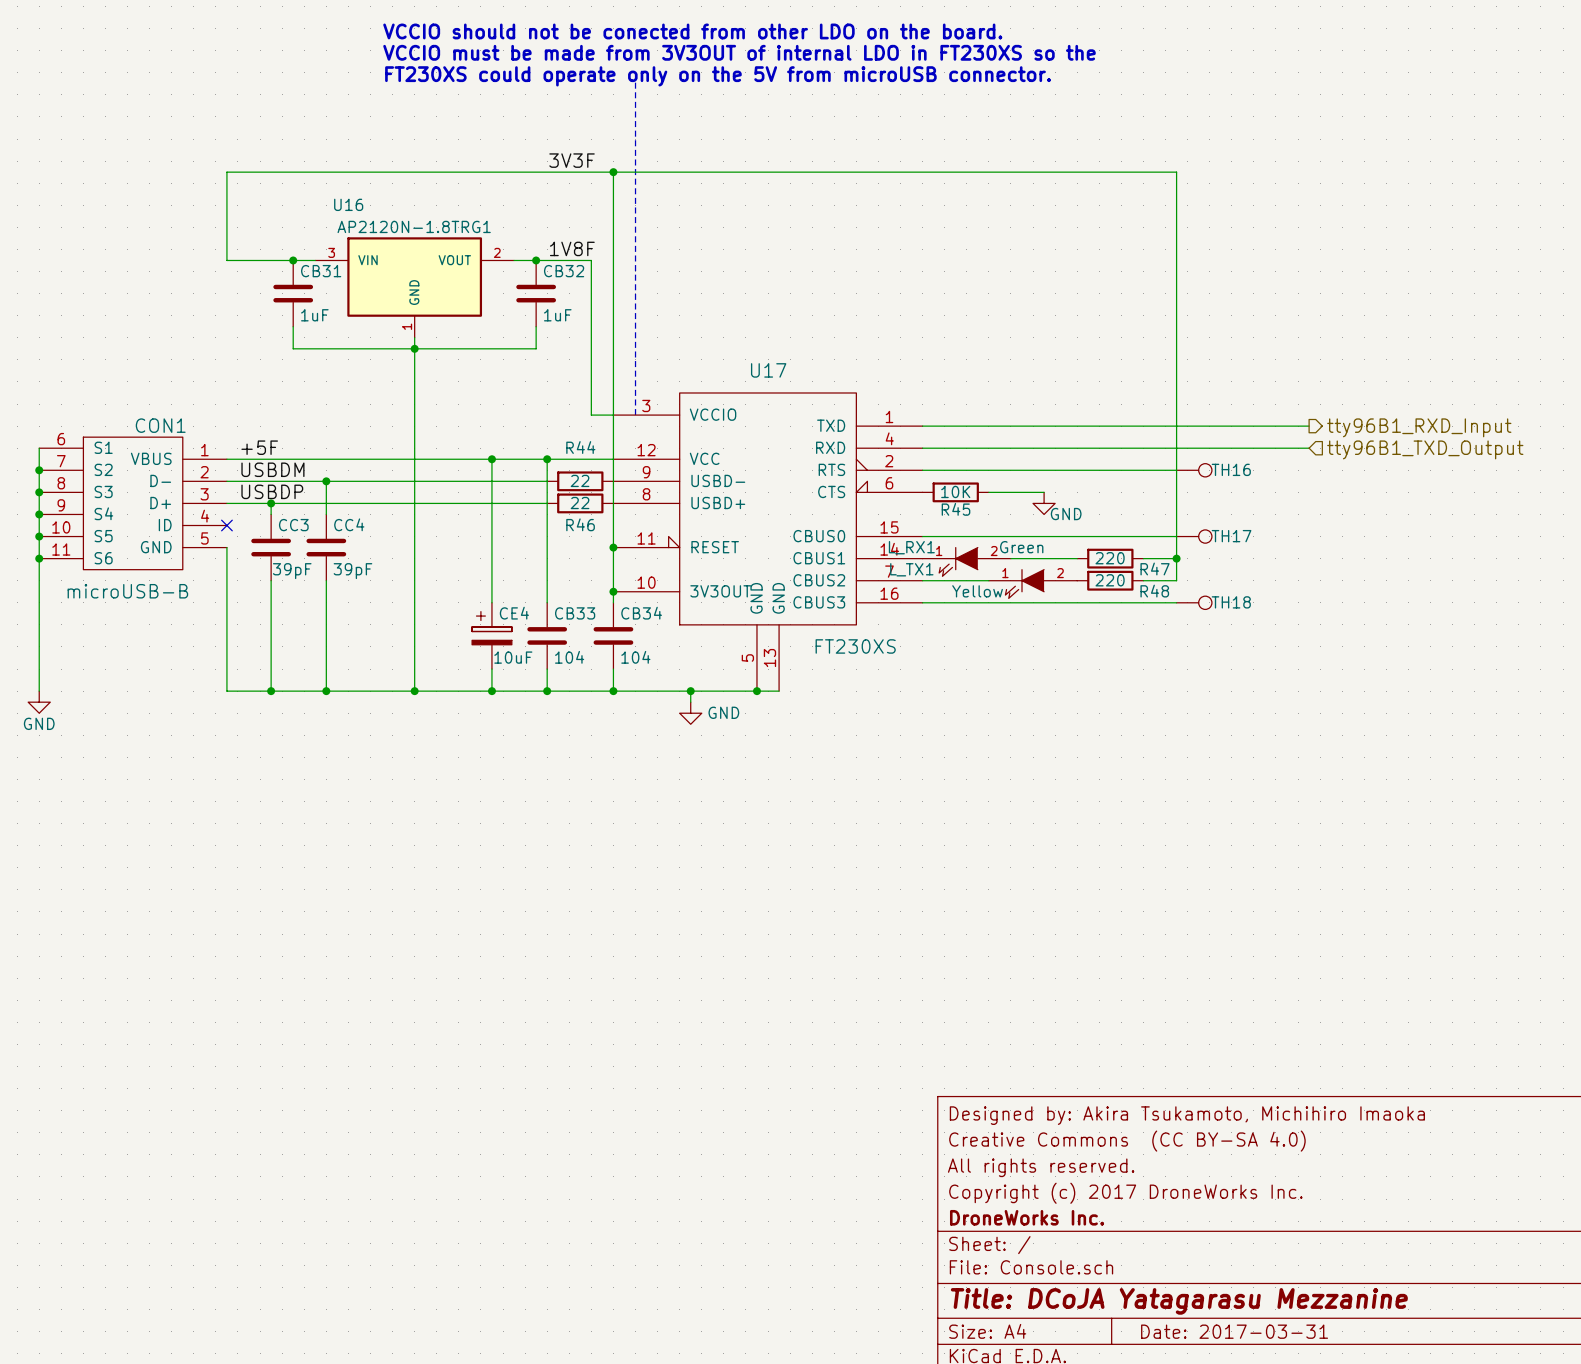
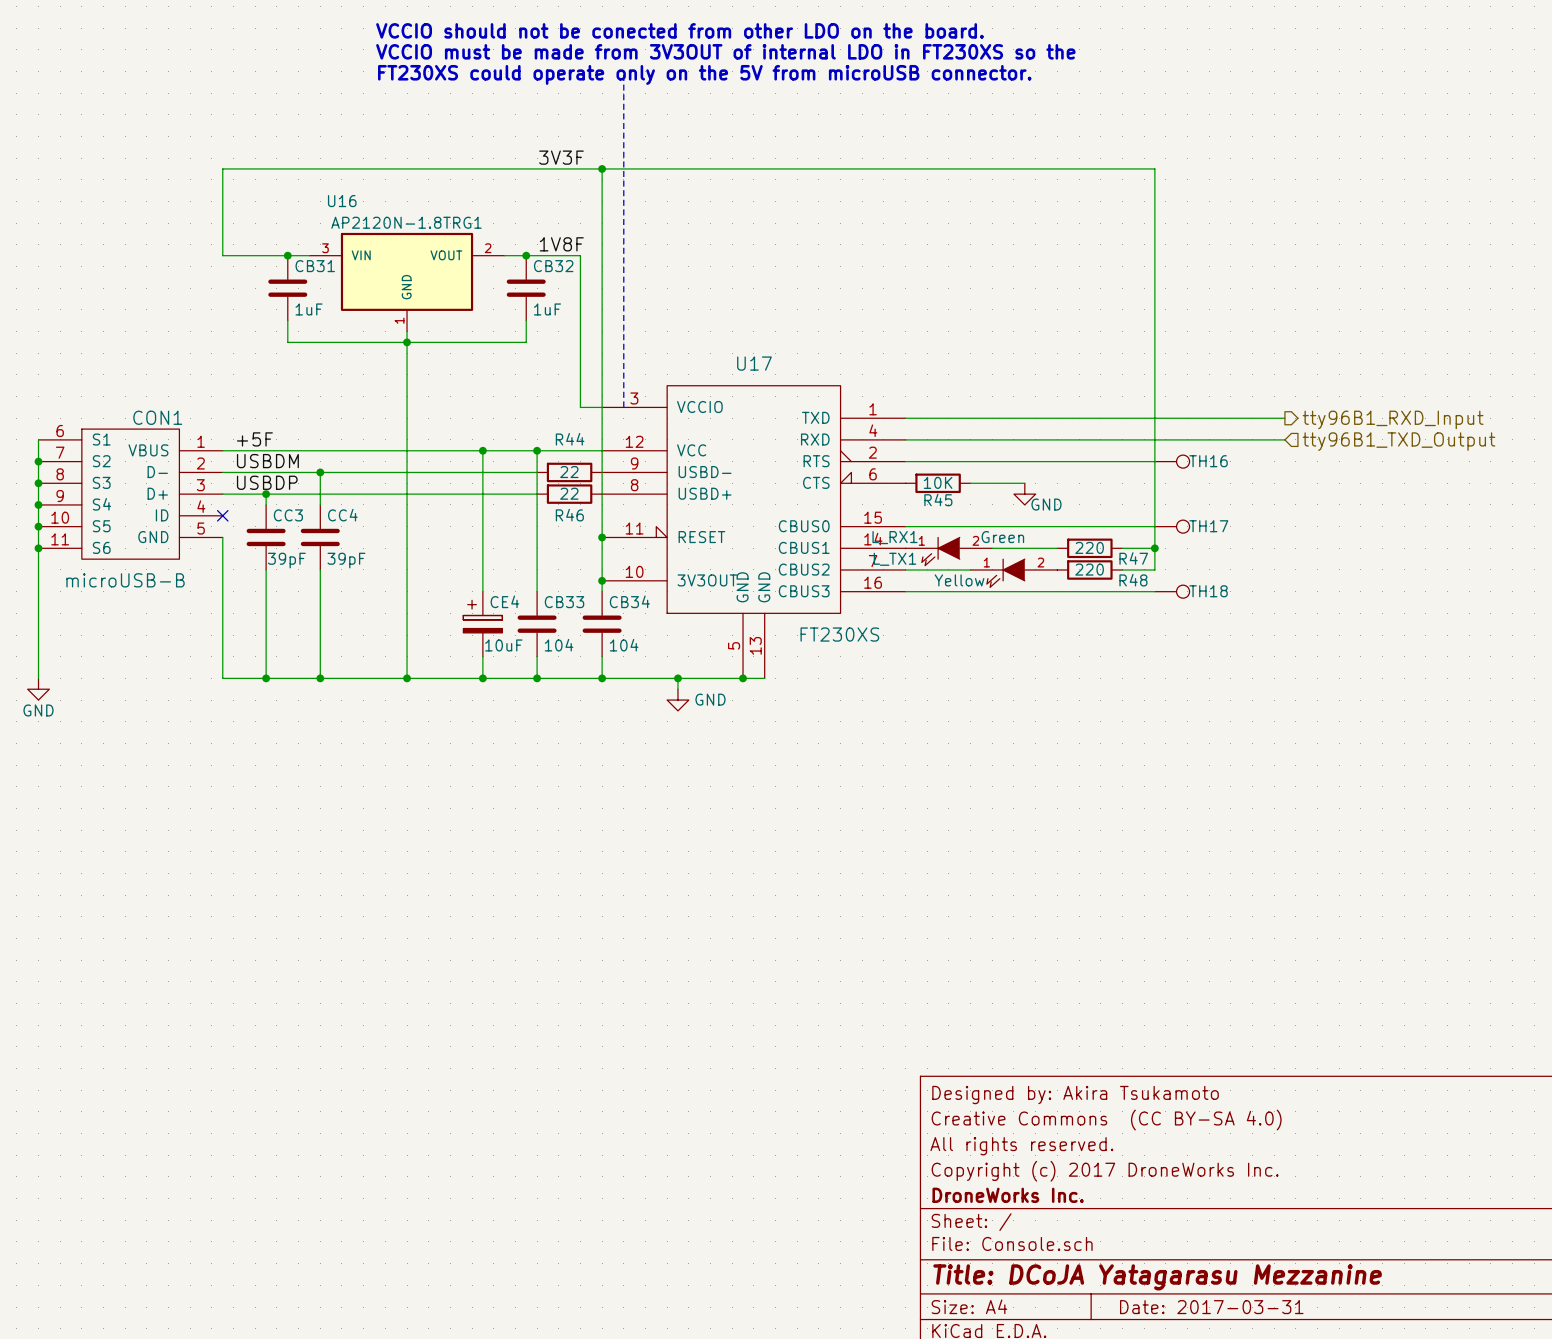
title block: Designed by: Akira Tsukamoto, Michihiro Imaoka (1187, 1115) -> Designed by: Akira Tsukamoto (1075, 1095)

